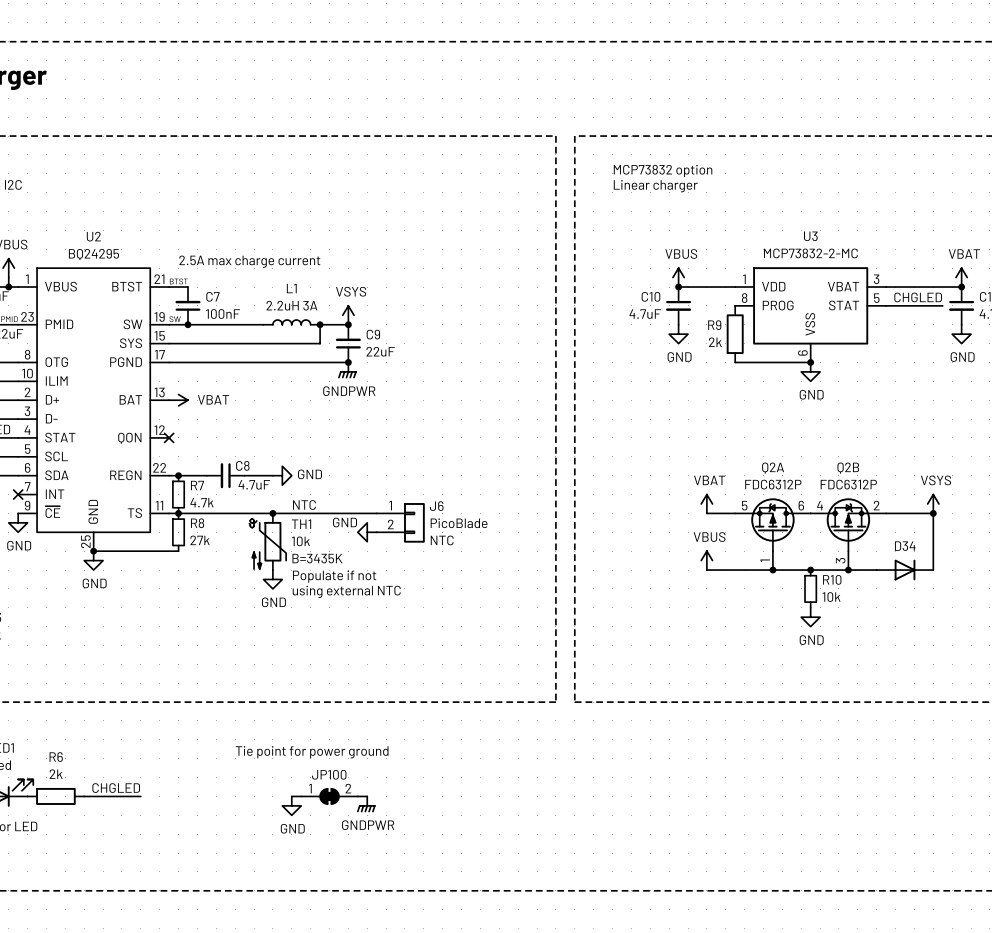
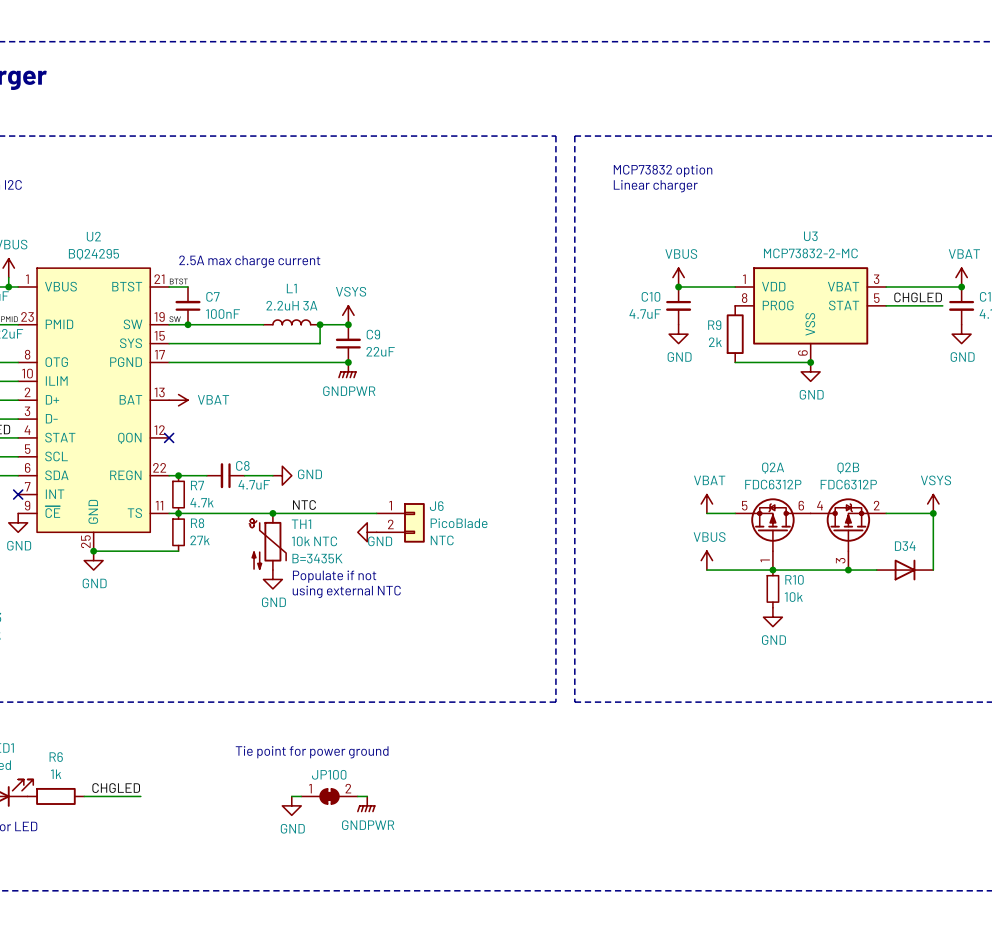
power symbol text position: GND (345, 522) -> GND (380, 541)
TH1 value: 10k (300, 541) -> 10k NTC (314, 541)
junction: (810, 570) -> none
R10 position: (810, 588) -> (772, 588)
power symbol position: GND (810, 617) -> GND (772, 617)
R6 value: 2k (56, 774) -> 1k (56, 774)

